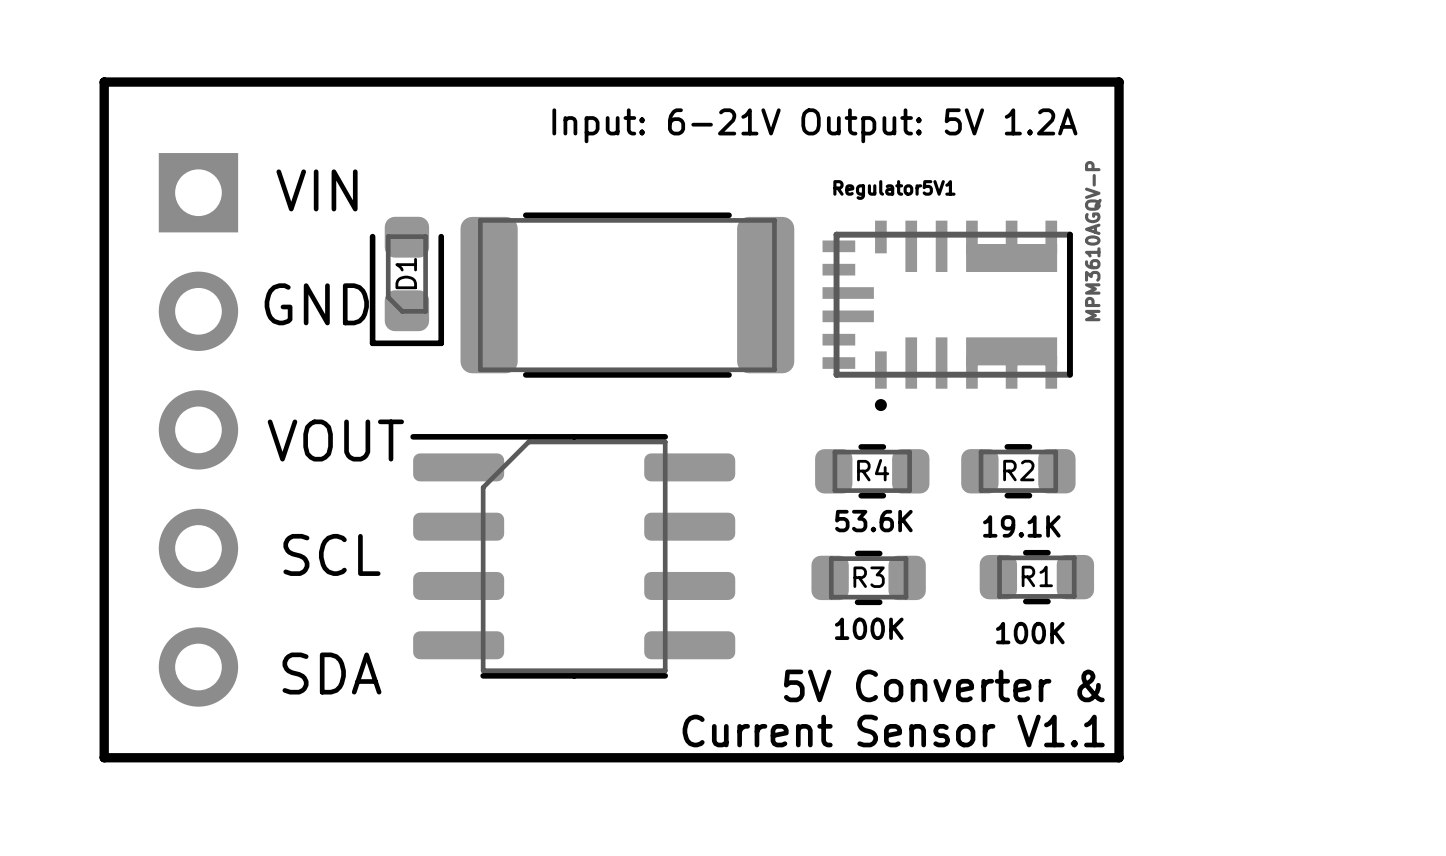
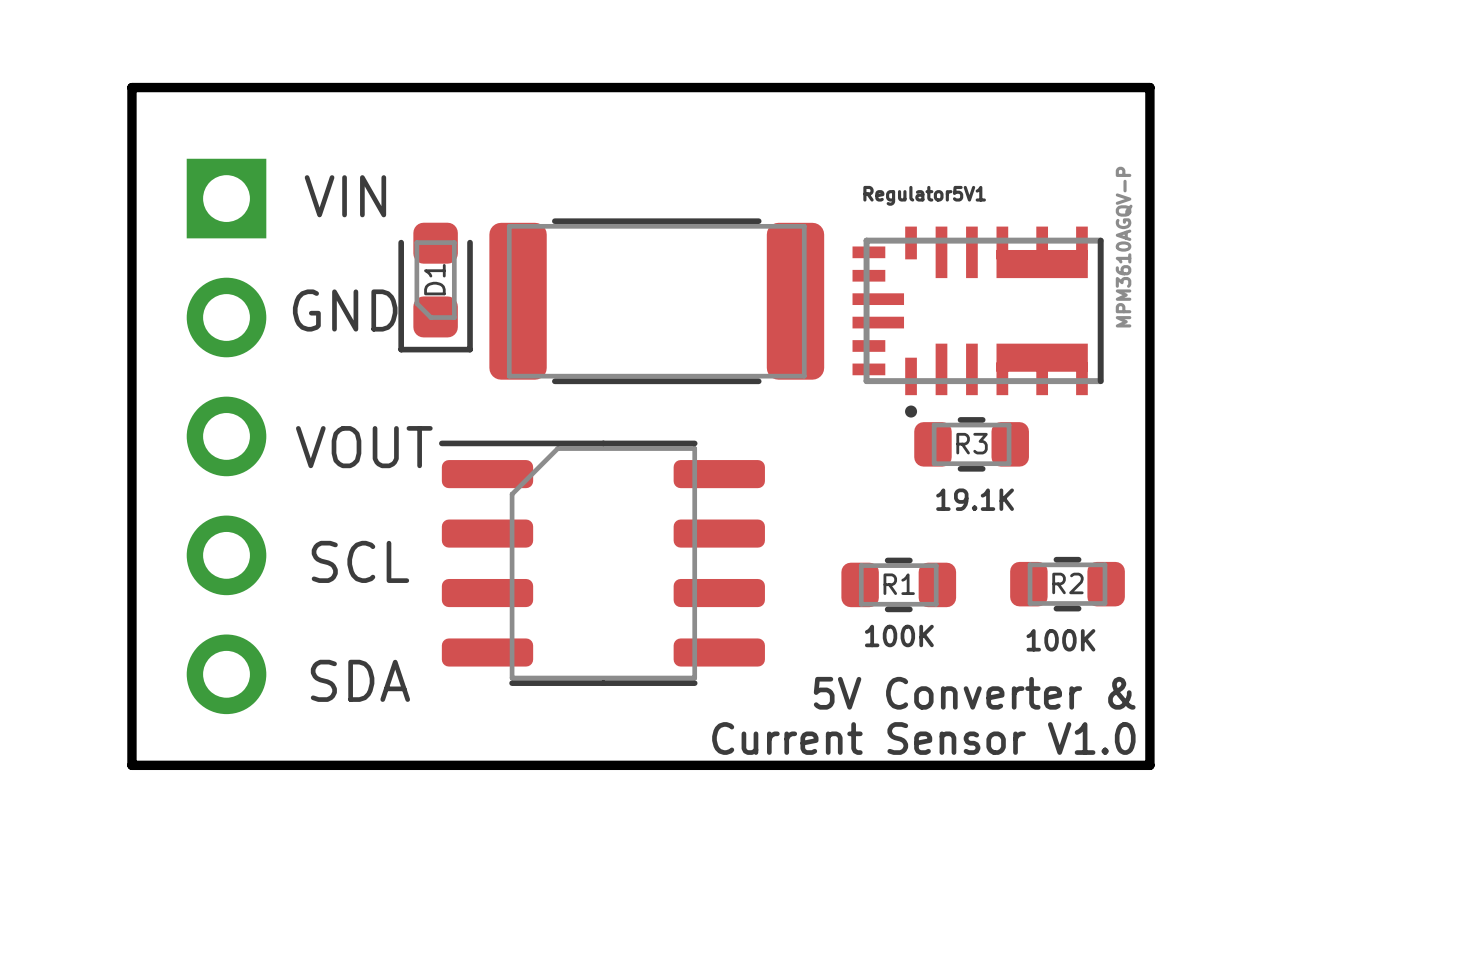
text: Input: 6-21V Output: 5V 1.2A (814, 125) -> none
R3: none -> 19.1K (971, 444)
R4: 53.6K (872, 471) -> none
R2: 19.1K (1018, 471) -> none
R1 name: R1 (1037, 576) -> R2 (1067, 583)
R3 name: R3 (869, 577) -> R1 (899, 584)
text: Current Sensor V1.1 (893, 731) -> Current Sensor V1.0 (923, 738)

